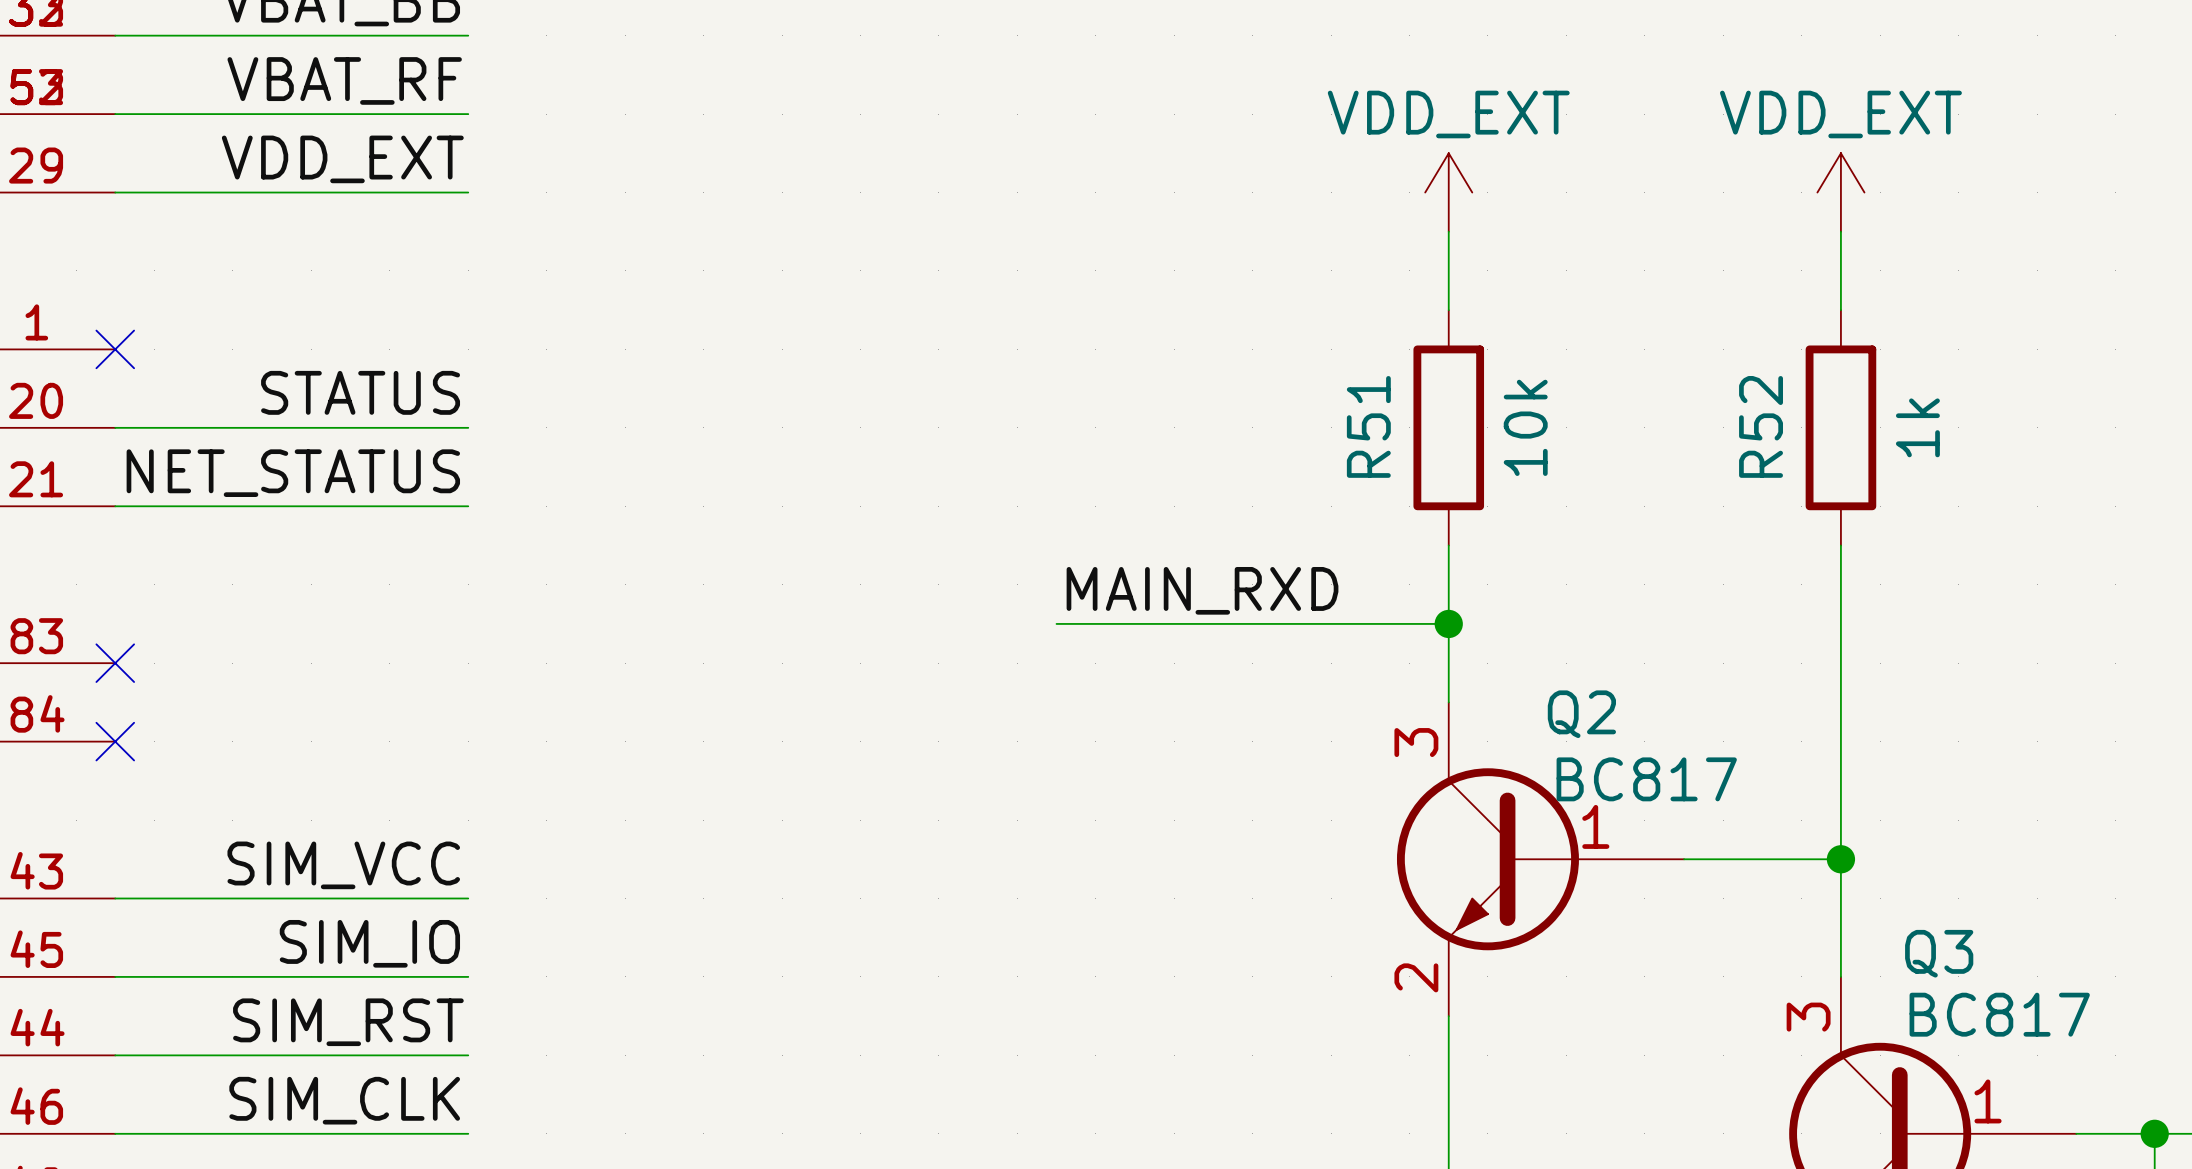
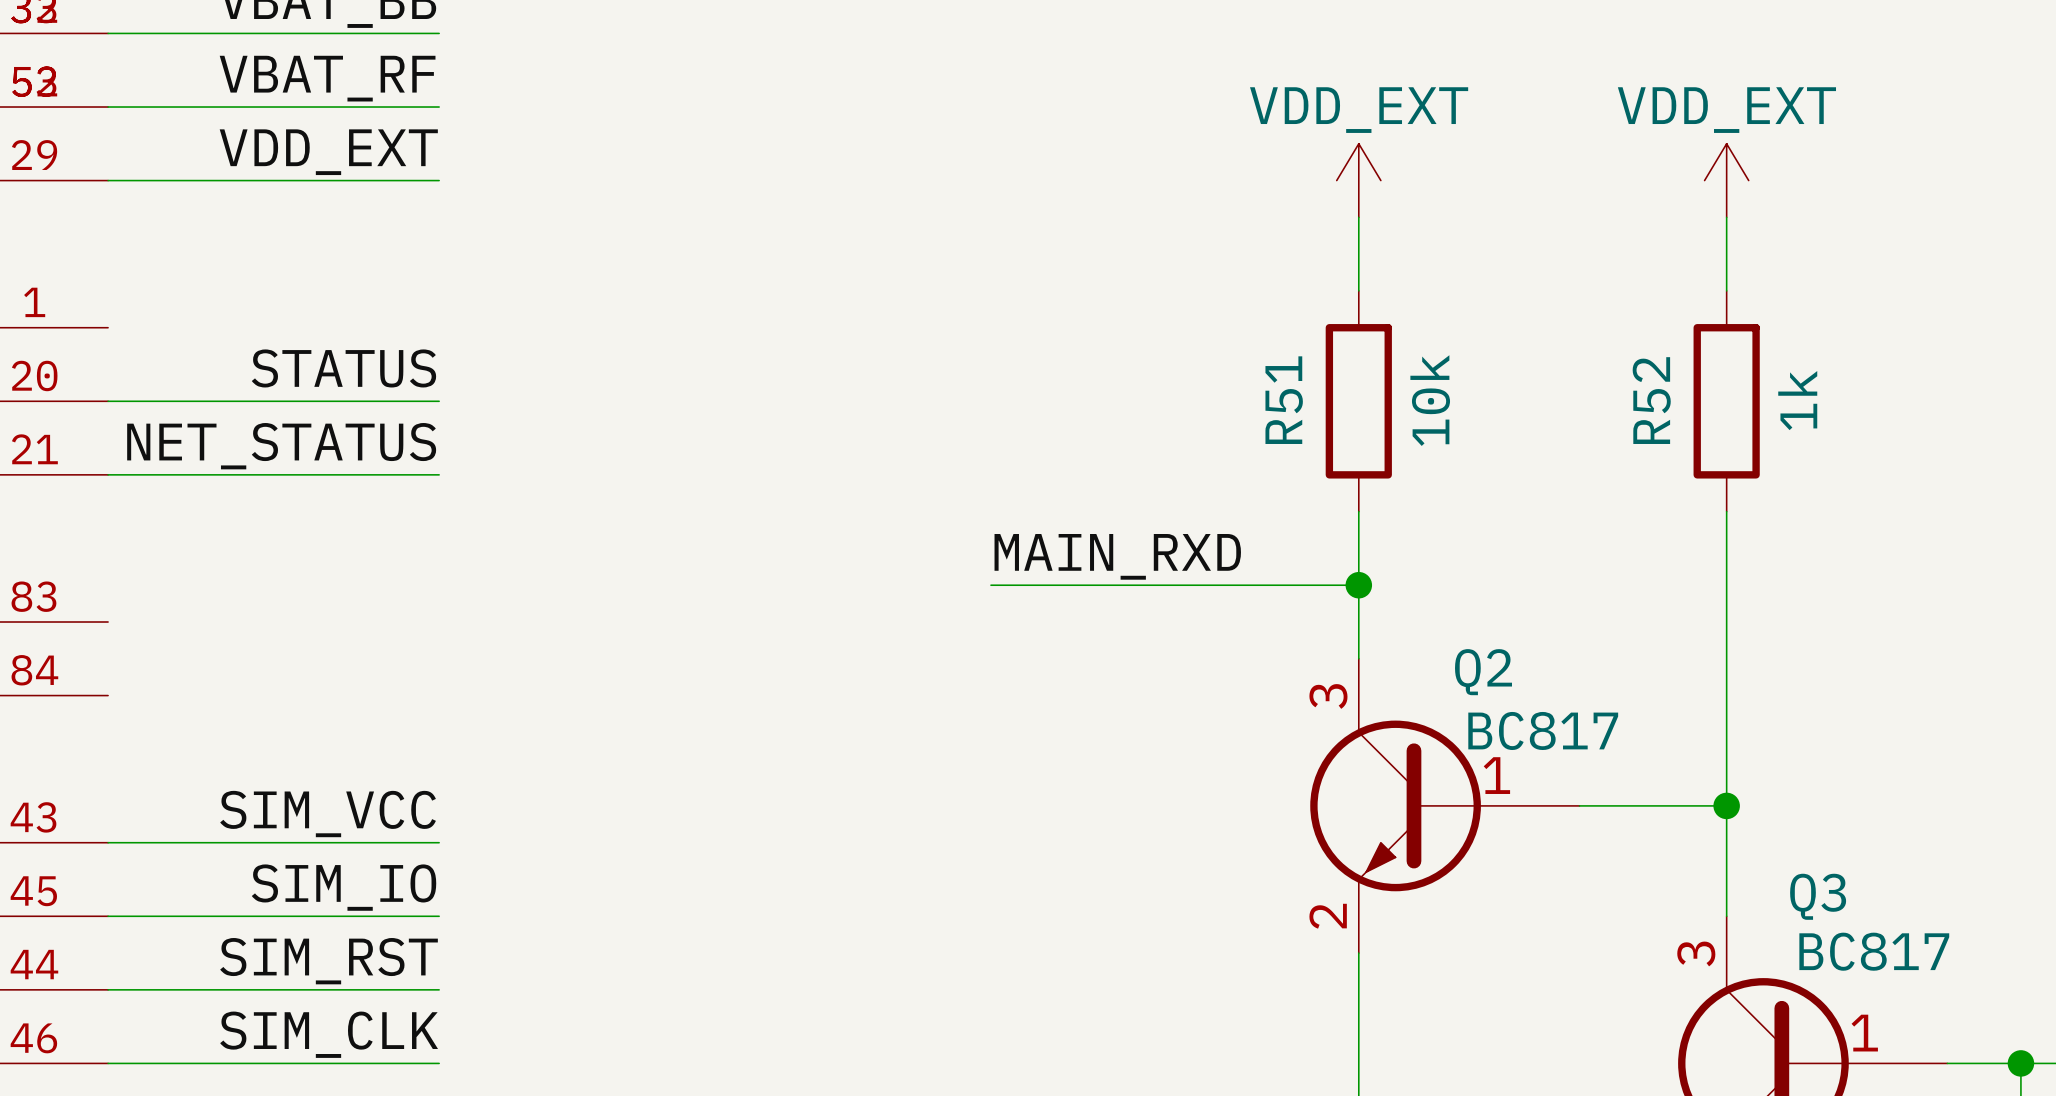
no-connect mark: (115, 349) -> none
no-connect mark: (115, 663) -> none
no-connect mark: (115, 741) -> none

